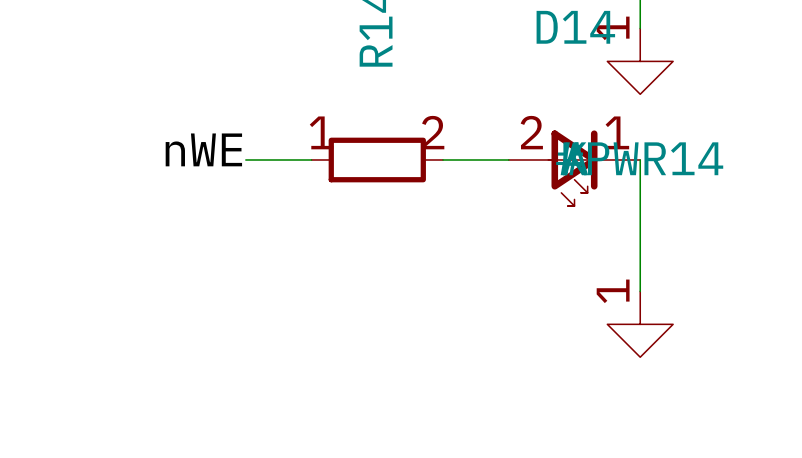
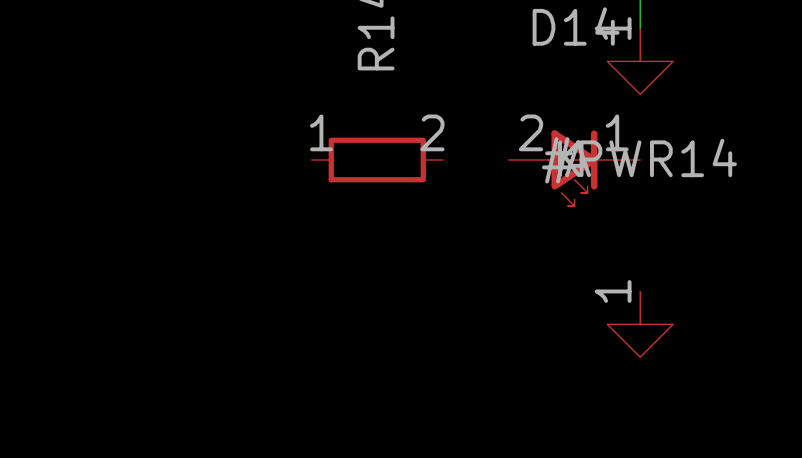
label: nWE (203, 149) -> none
wire: (245, 160) (311, 160) -> none
wire: (443, 160) (508, 160) -> none
wire: (640, 160) (640, 291) -> none

